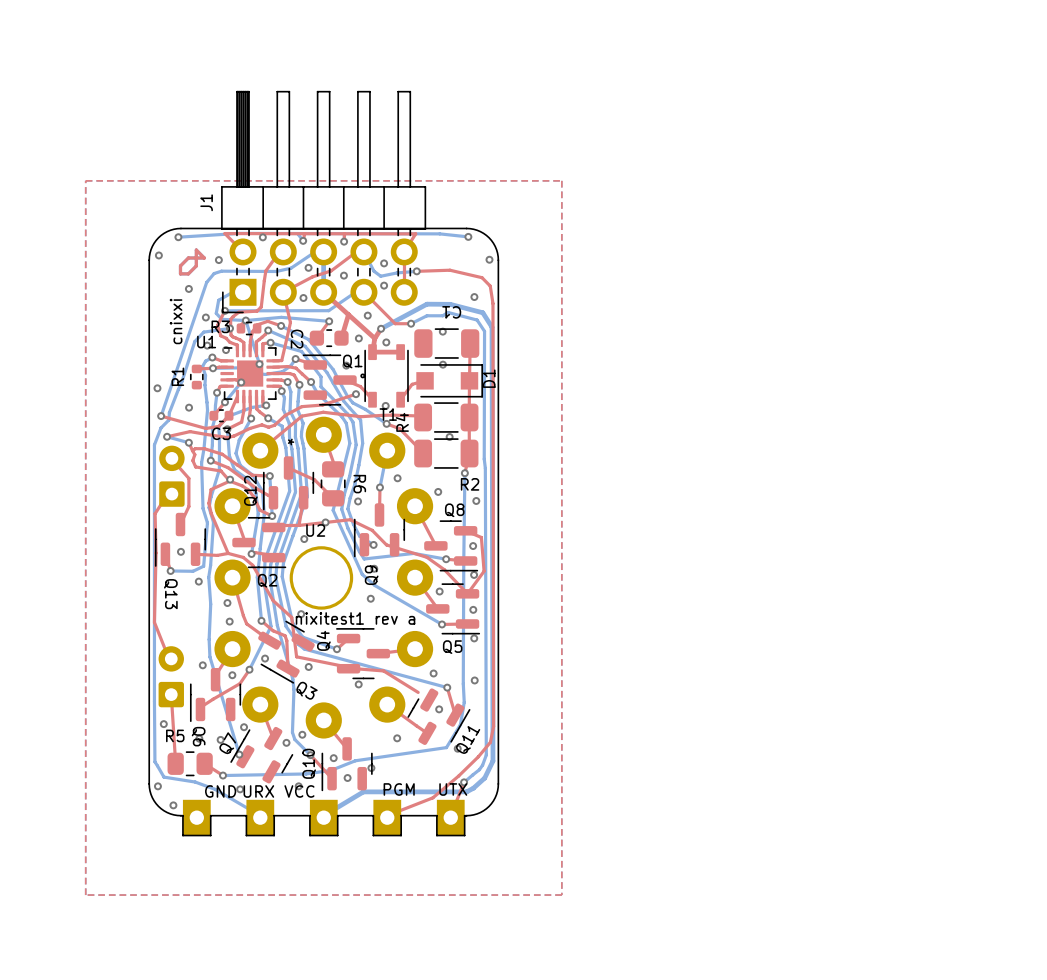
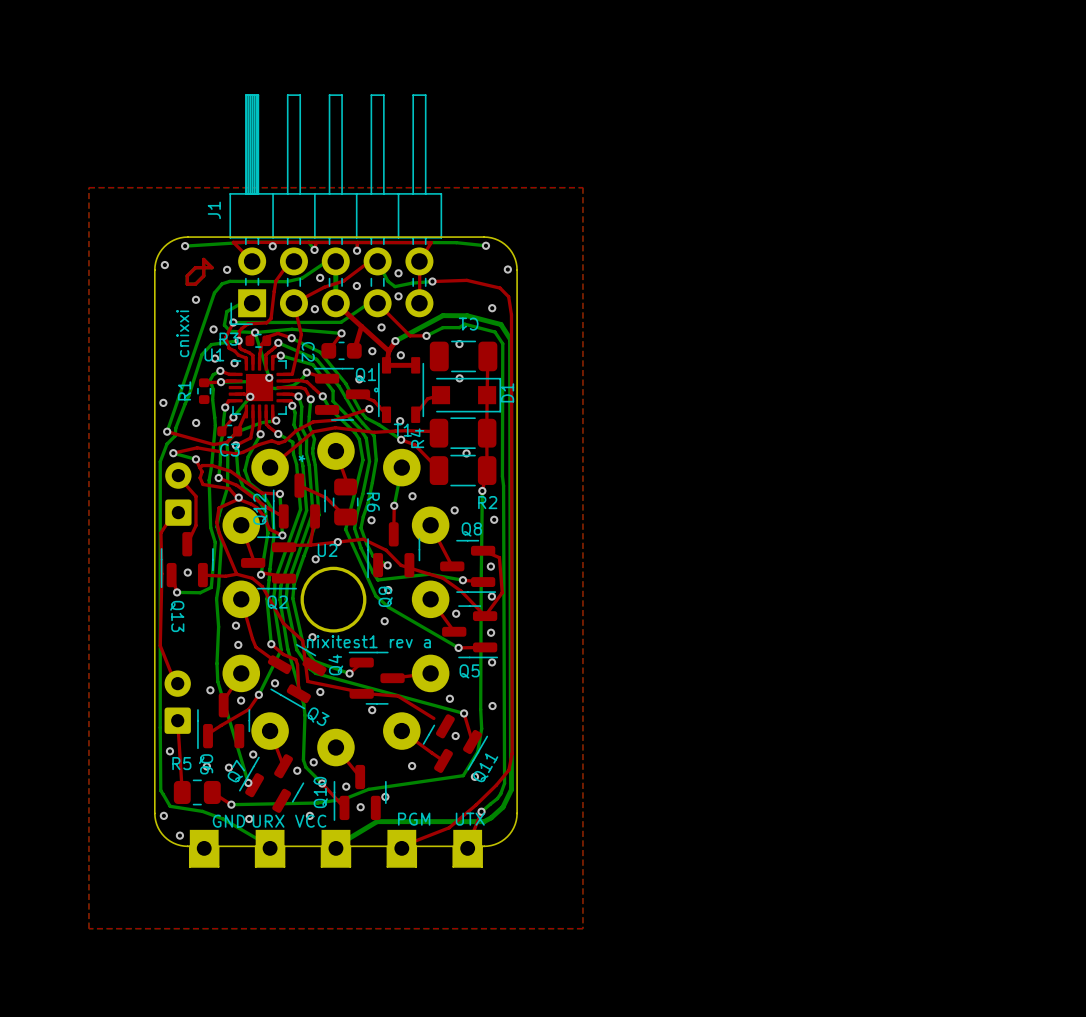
via: (198, 581) -> none

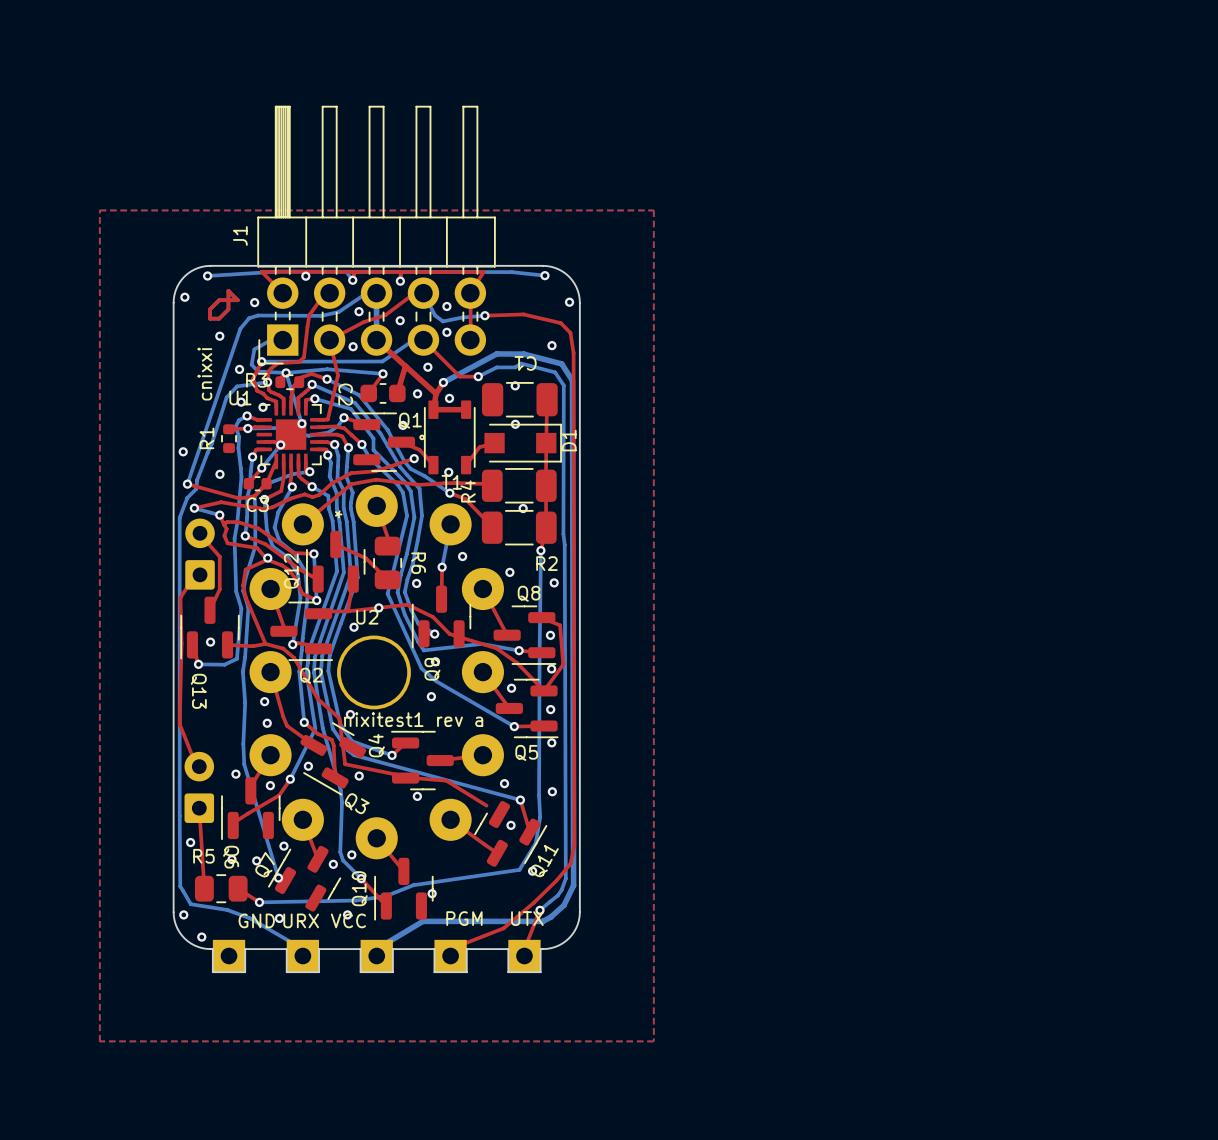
via: (412, 766) -> none
via: (346, 786) -> none
via: (360, 807) -> none
part footprint: [189, 829, 219, 867] -> [212, 939, 246, 973]
part footprint: [255, 829, 285, 867] -> [286, 939, 320, 973]
part footprint: [321, 829, 351, 867] -> [360, 939, 393, 973]
part footprint: [387, 829, 417, 867] -> [434, 939, 467, 973]
part footprint: [453, 829, 483, 867] -> [508, 939, 541, 973]

